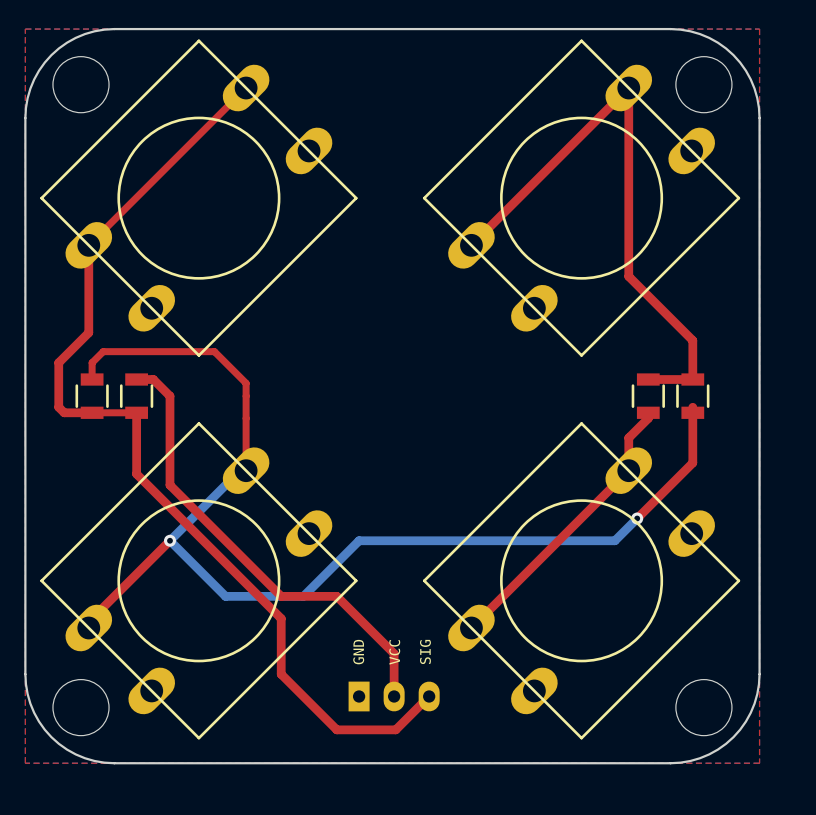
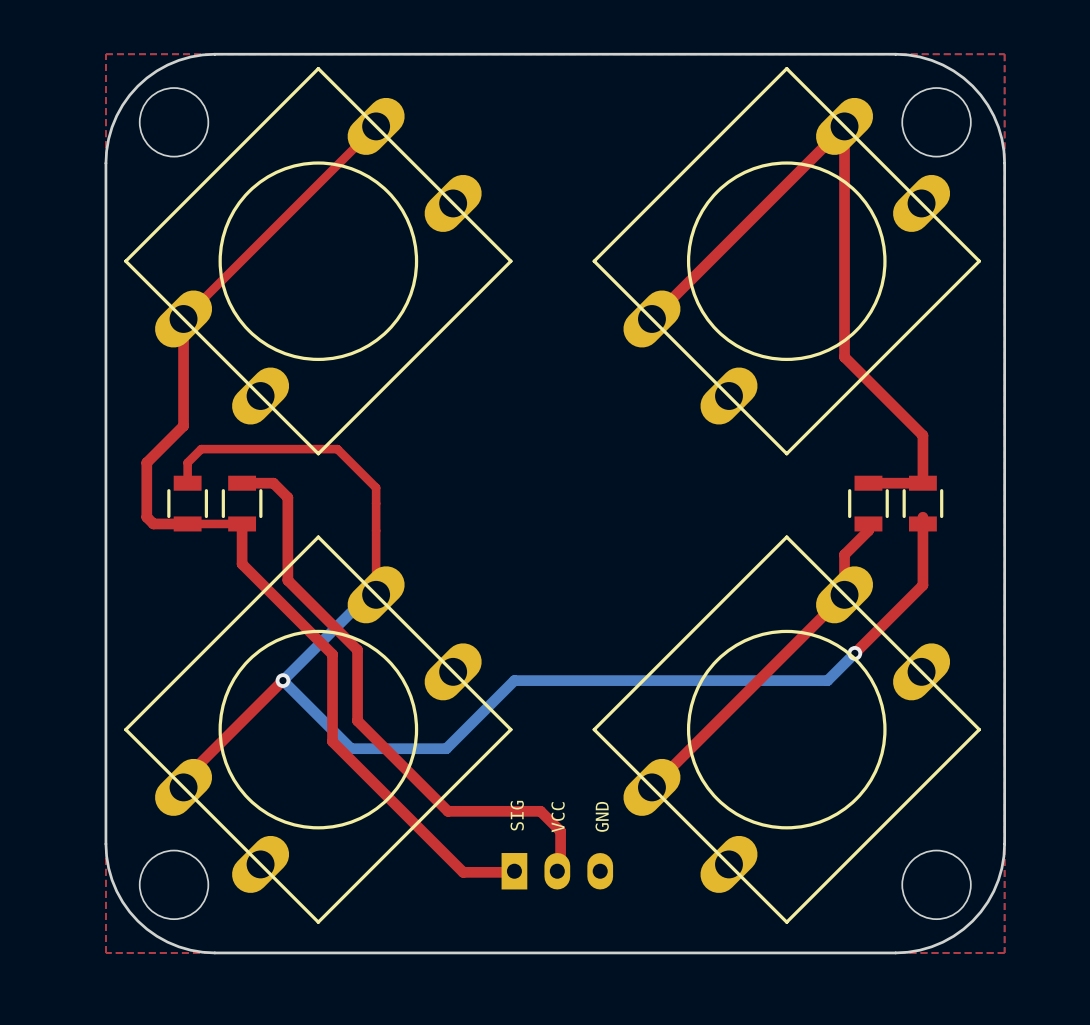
top track: (153, 379) (169, 396) (169, 485) (281, 596) (336, 596) (394, 653) (394, 696) -> (262, 483) (273, 483) (287, 497) (287, 580) (357, 650) (357, 720) (447, 811) (540, 811) (560, 831) (560, 872)
top track: (136, 445) (136, 474) (281, 618) (281, 674) (336, 729) (395, 729) (429, 696) -> (242, 564) (332, 654) (332, 741) (463, 872) (517, 872)
text: SIG (425, 651) -> GND (602, 816)
text: GND (358, 652) -> SIG (517, 815)

